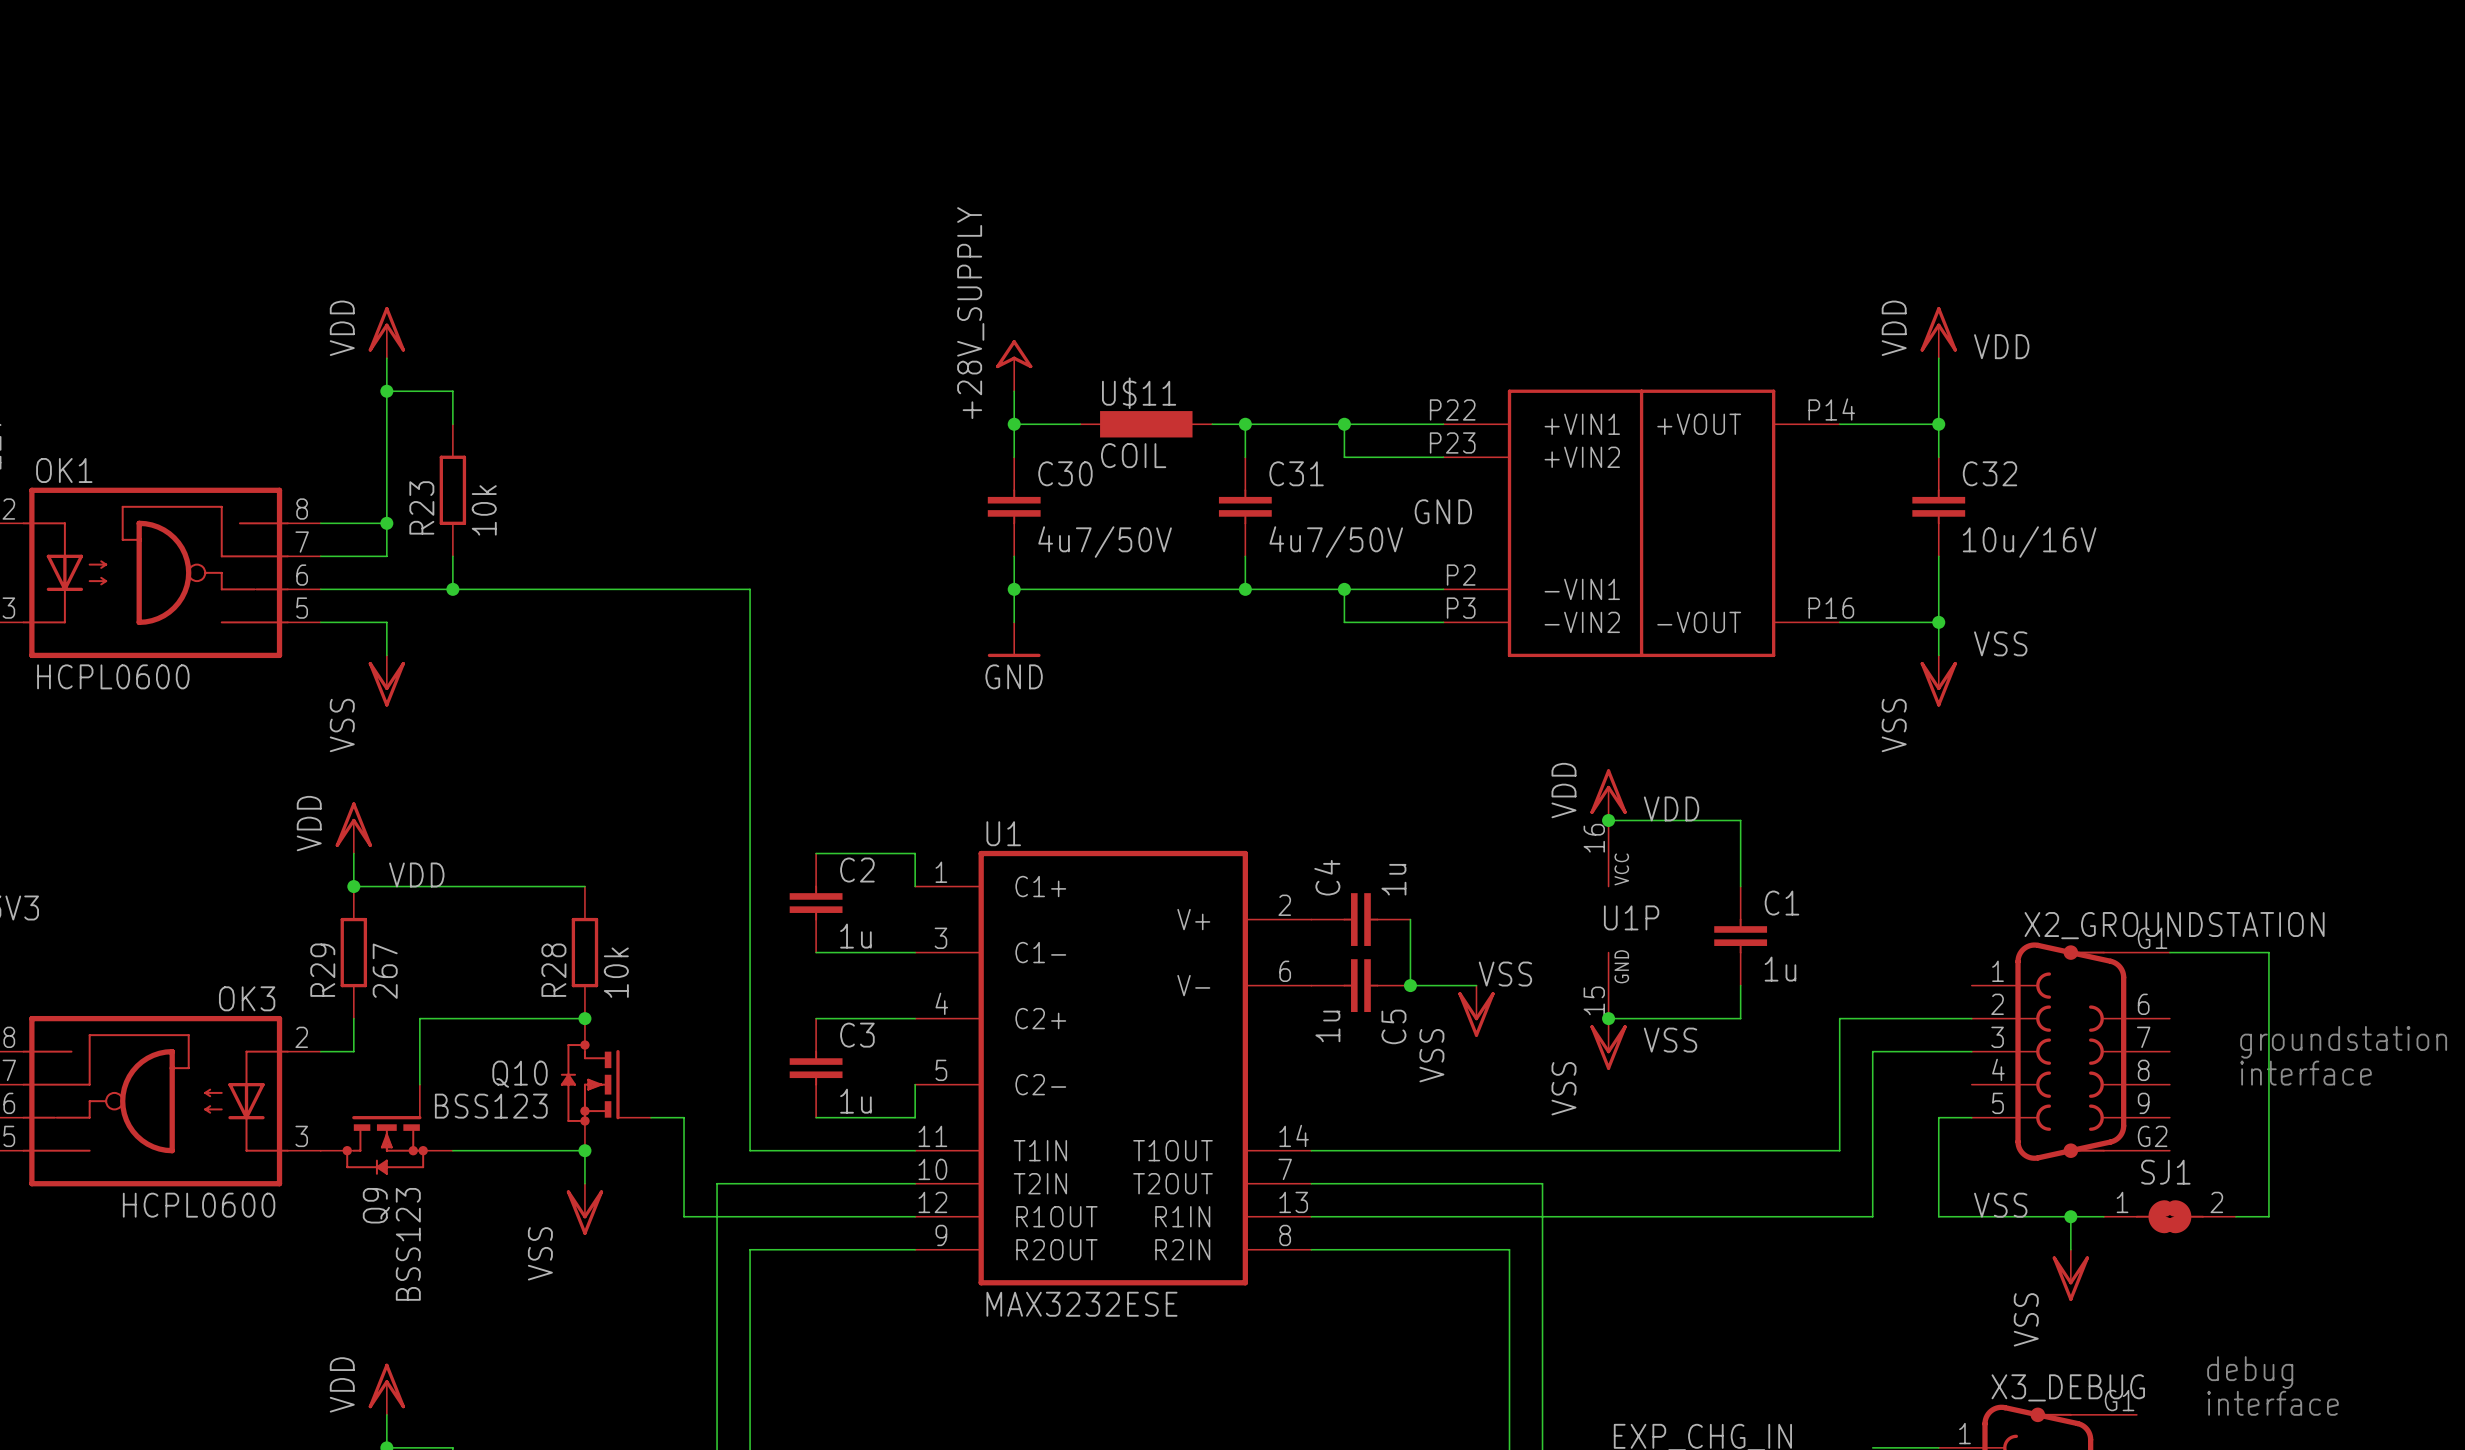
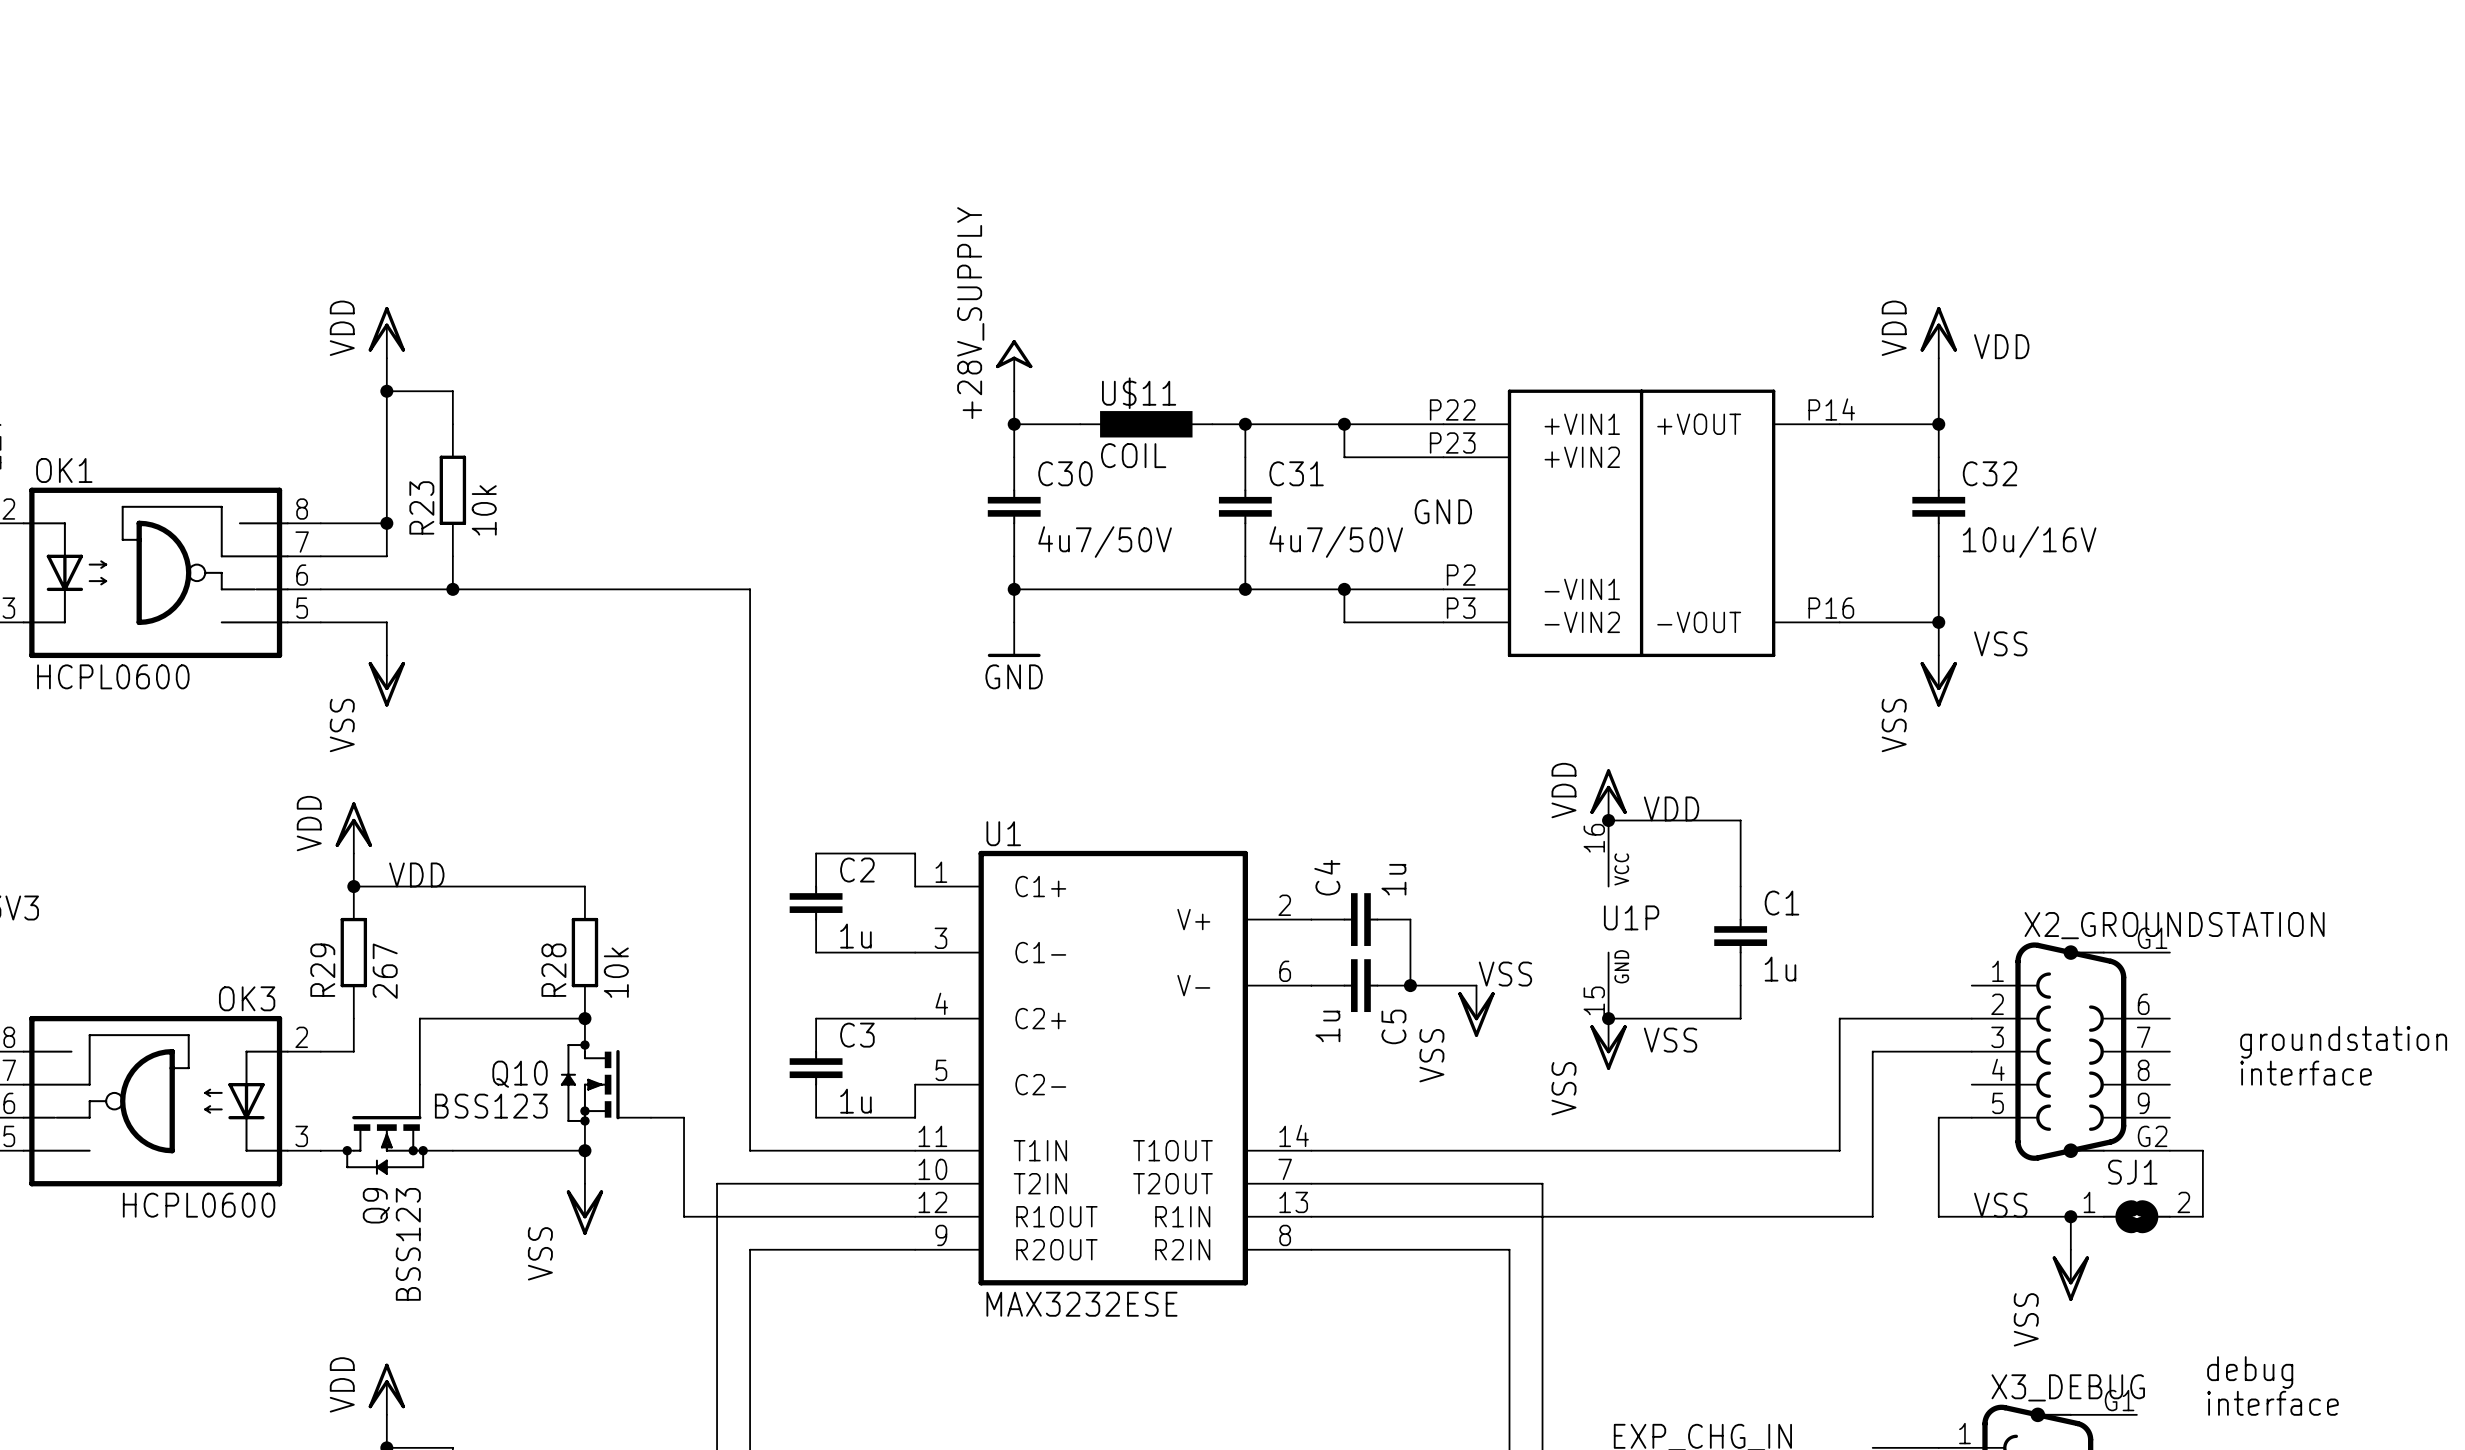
wire: (2169, 952) (2268, 952) (2268, 1216) (2235, 1216) -> none
wire: none -> (2169, 1150) (2202, 1150) (2202, 1216)
SJ1 position: (2169, 1216) -> (2136, 1216)

